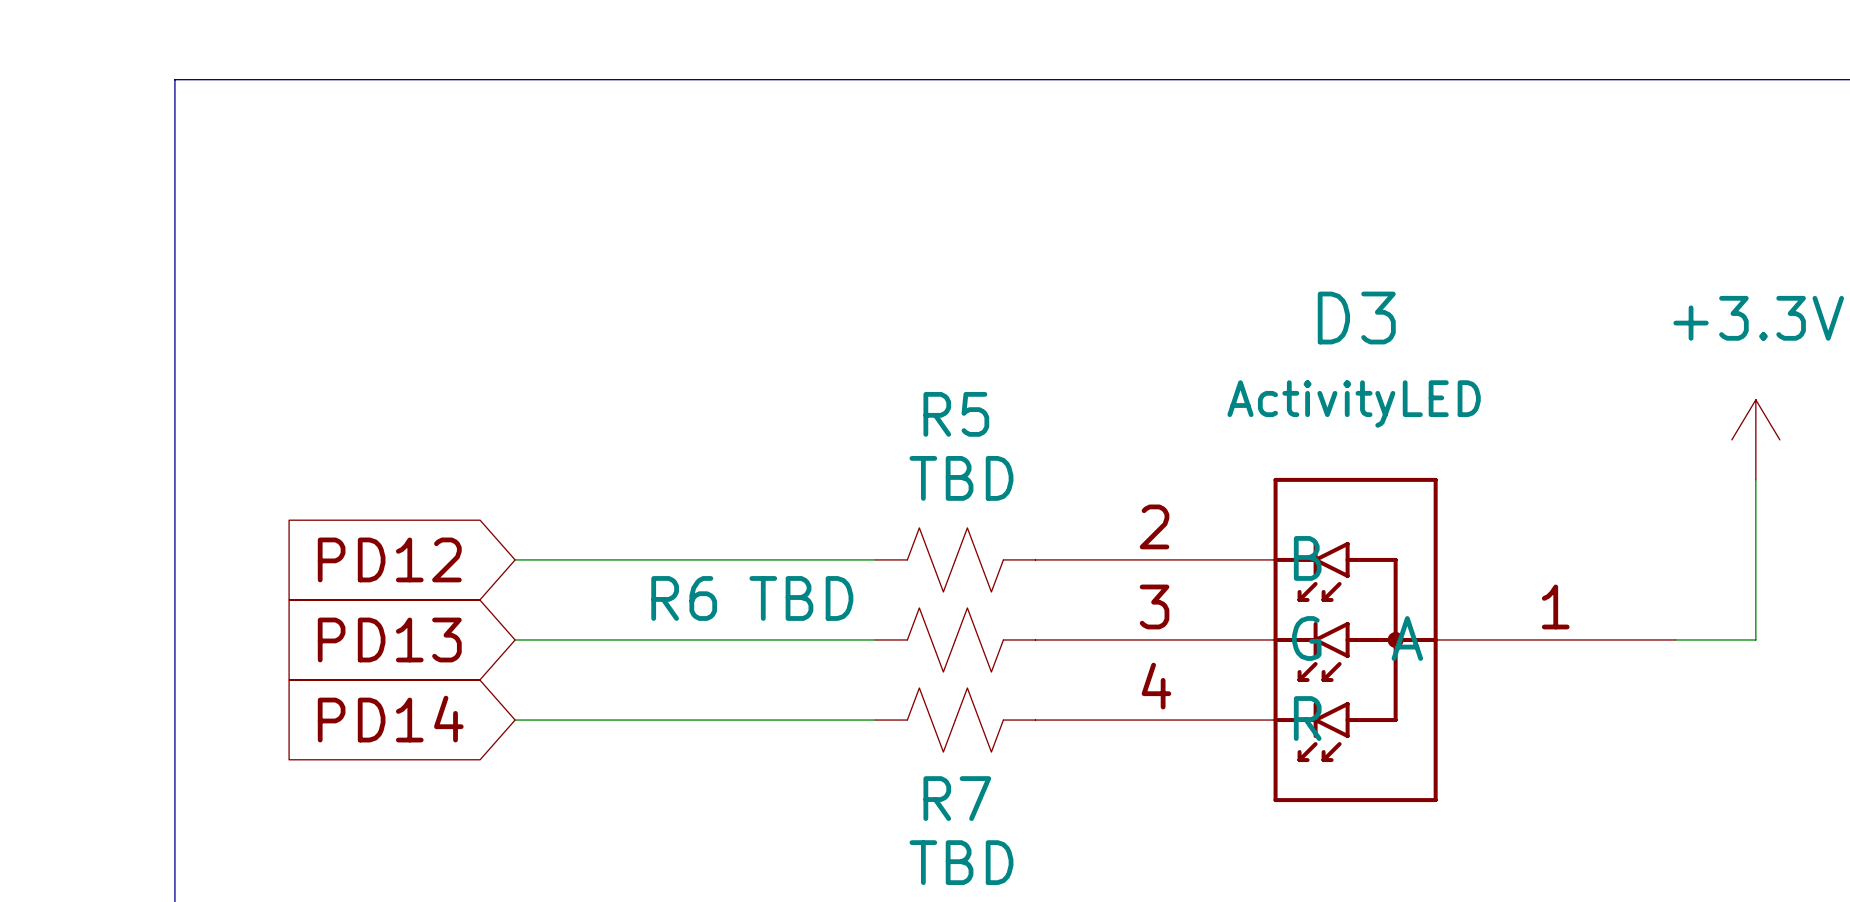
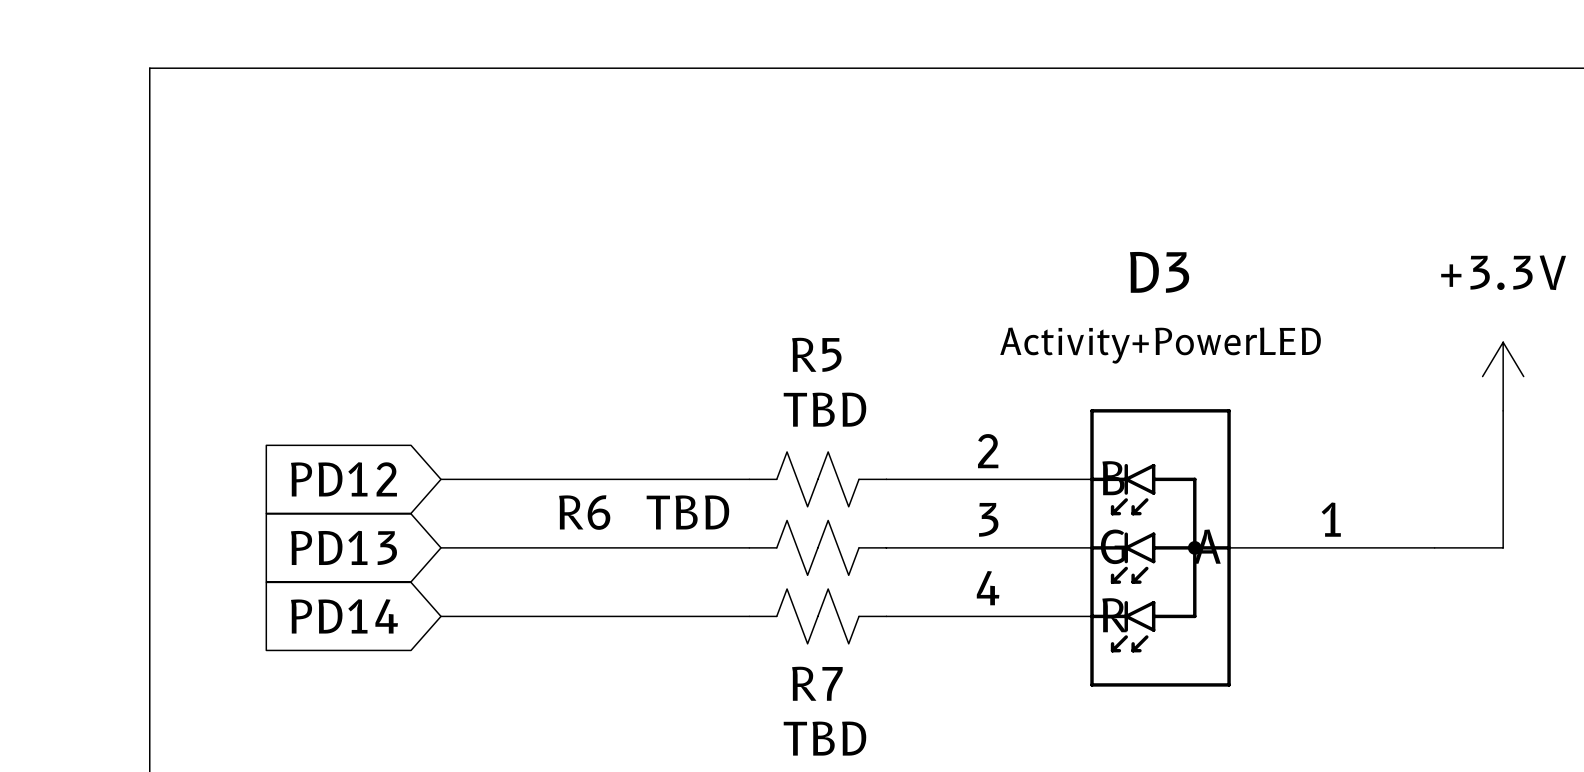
D3 value: ActivityLED (1354, 403) -> Activity+PowerLED (1160, 345)

